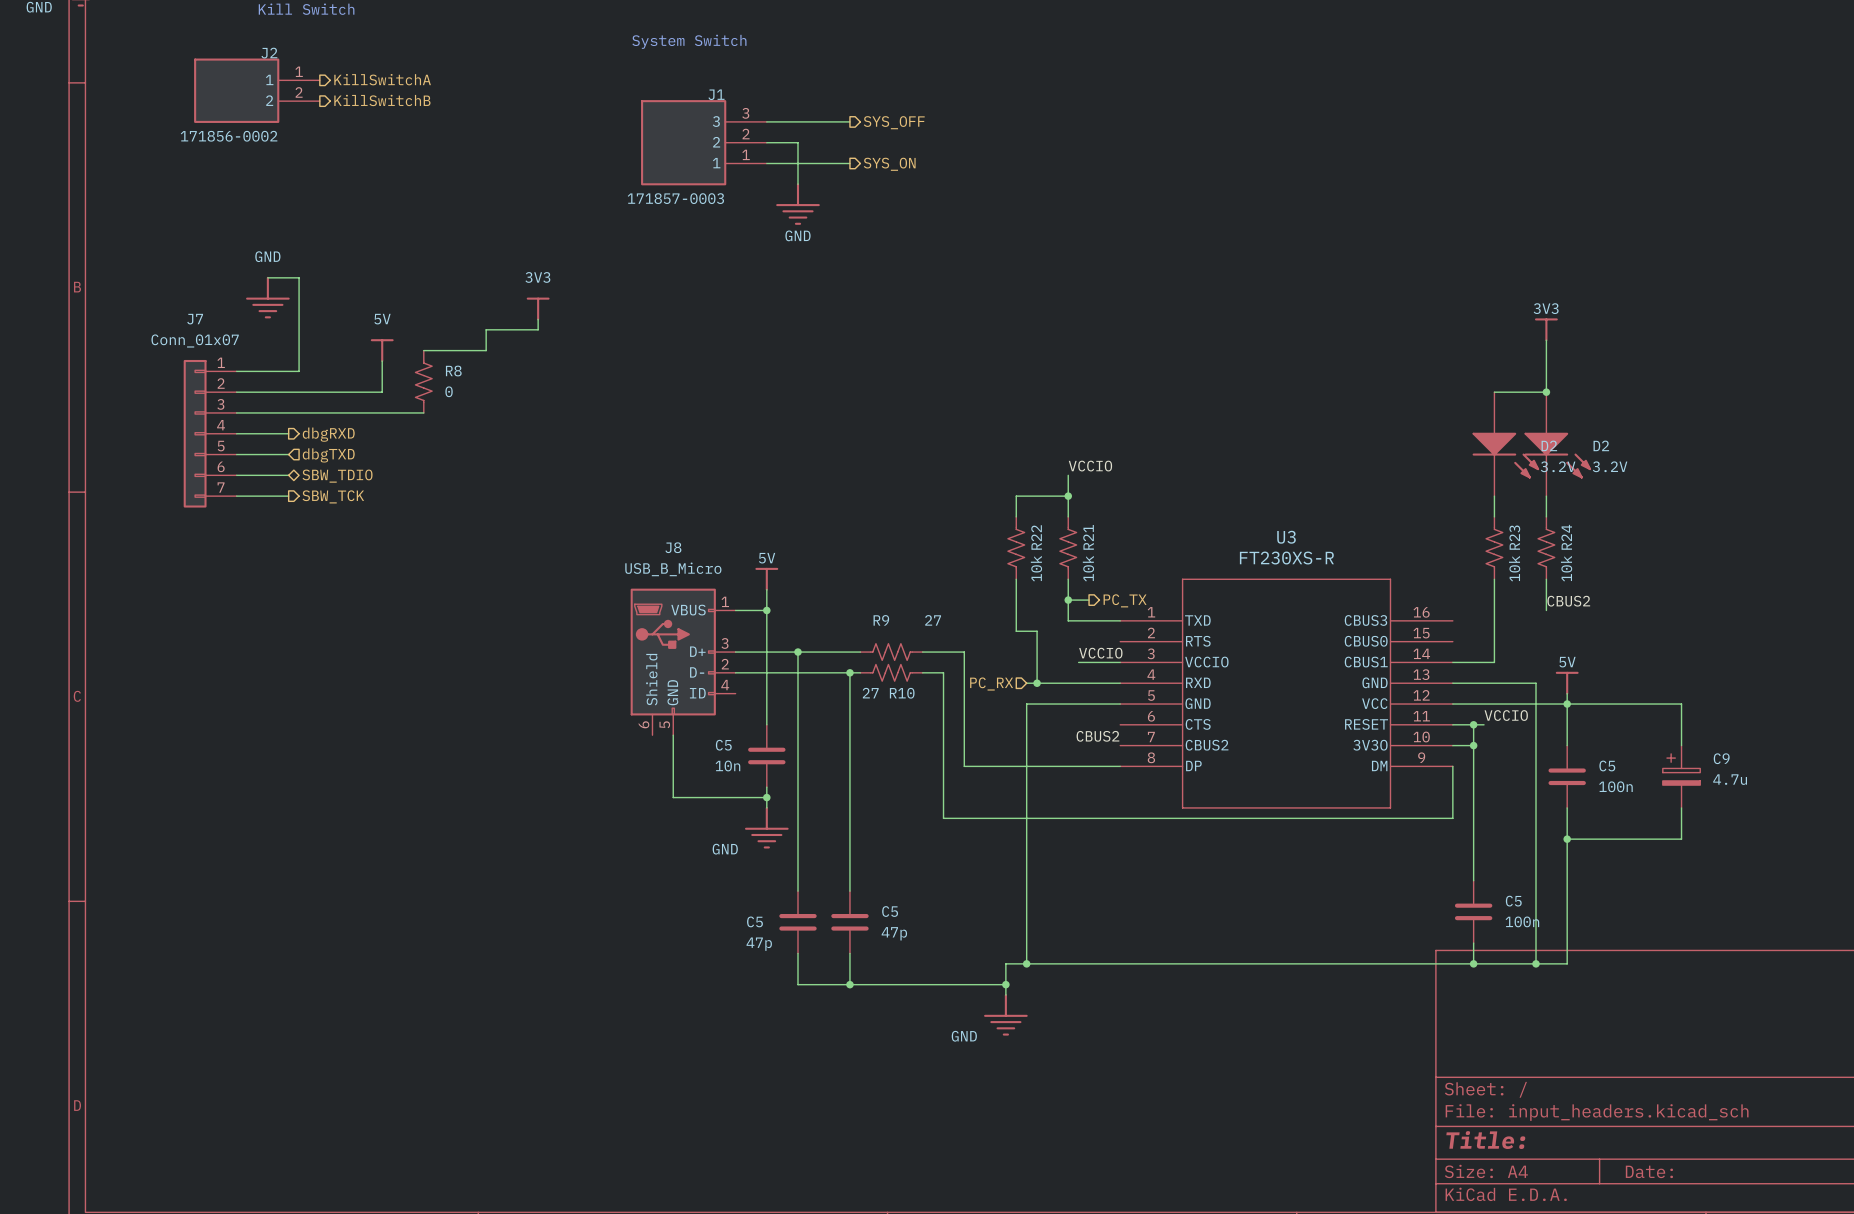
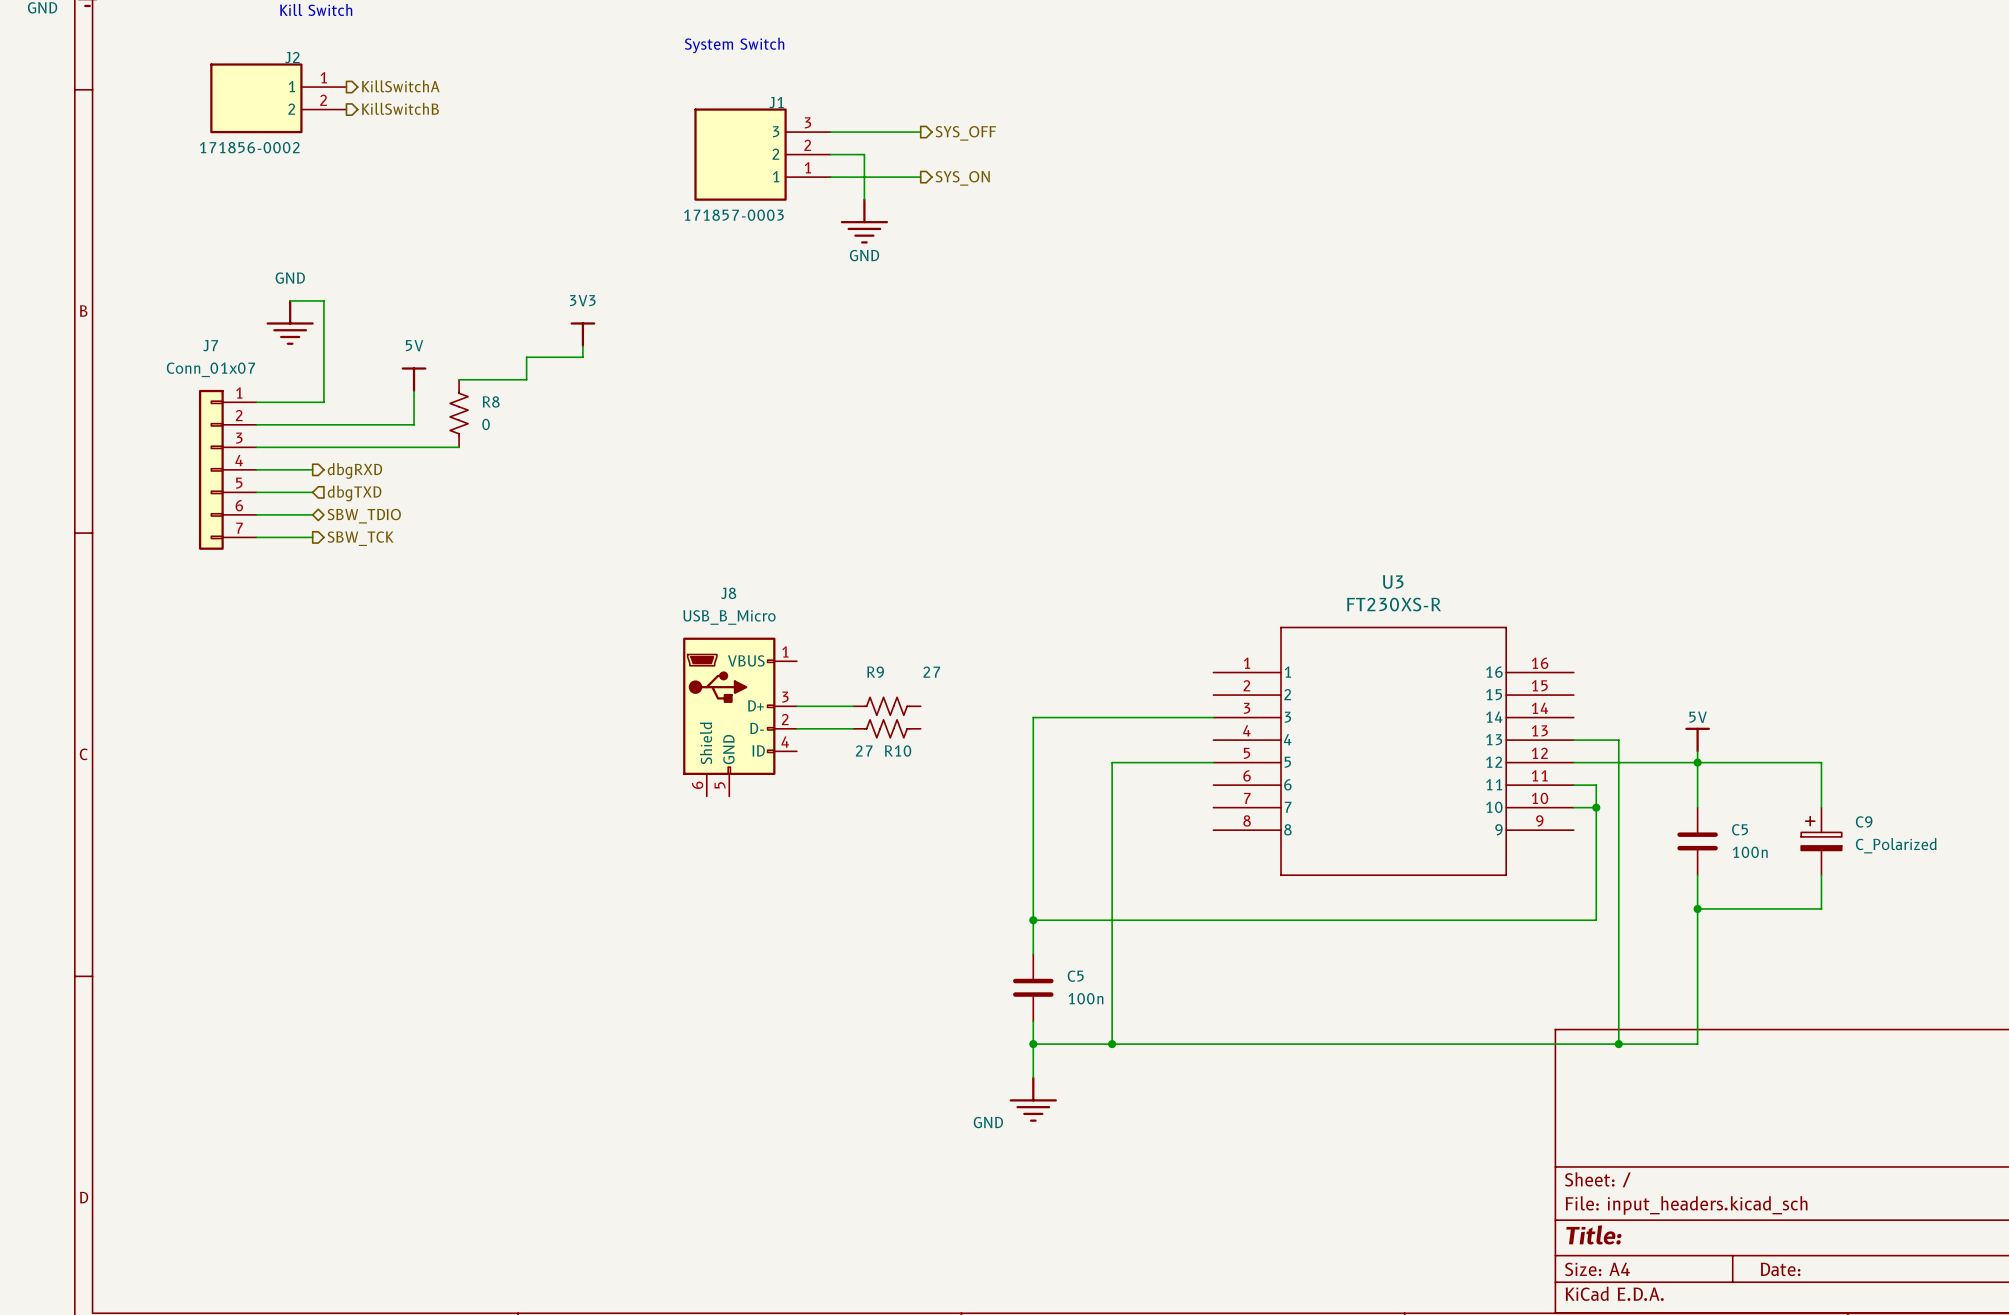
power symbol: 3V3 (1546, 329) -> none
wire: (1546, 340) (1546, 392) (1494, 392) -> none
junction: (1546, 392) -> none
D2: 3.2V (1505, 444) -> none
D2: 3.2V (1557, 444) -> none
label: VCCIO (1090, 466) -> none
wire: (1068, 475) (1068, 516) -> none
wire: (1068, 496) (1016, 496) (1016, 516) -> none
junction: (1068, 496) -> none
wire: (1494, 496) (1494, 516) -> none
wire: (1546, 496) (1546, 516) -> none
R22: 10k (1016, 548) -> none
R21: 10k (1068, 548) -> none
R23: 10k (1494, 548) -> none
R24: 10k (1546, 548) -> none
U3 symbol: [1120, 578, 1453, 809] -> [1213, 626, 1574, 876]
power symbol: 5V (766, 579) -> none
wire: (1016, 579) (1016, 631) (1037, 631) (1037, 683) -> none
wire: (1068, 579) (1068, 620) (1120, 620) -> none
wire: (1494, 579) (1494, 662) (1452, 662) -> none
wire: (1546, 579) (1546, 610) -> none
wire: (766, 589) (766, 724) -> none
wire: (1068, 600) (1089, 600) -> none
junction: (1068, 600) -> none
hierarchical label: PC_TX (1125, 600) -> none
label: CBUS2 (1568, 601) -> none
wire: (735, 610) (766, 610) -> none
junction: (766, 610) -> none
wire: (787, 652) (860, 652) -> none
wire: (797, 652) (797, 891) -> none
junction: (797, 652) -> none
R9 position: (891, 652) -> (886, 706)
wire: (922, 652) (964, 652) (964, 766) (1120, 766) -> none
label: VCCIO (1100, 653) -> none
wire: none -> (1168, 717) (1033, 717) (1033, 954)
wire: (787, 672) (860, 672) -> none
wire: (849, 672) (849, 891) -> none
junction: (849, 672) -> none
R10 position: (891, 672) -> (886, 728)
wire: (922, 672) (943, 672) (943, 818) (1452, 818) (1452, 766) -> none
wire: (1026, 683) (1120, 683) -> none
junction: (1037, 683) -> none
wire: (1494, 683) (1536, 683) (1536, 963) -> (1618, 740) (1618, 1044)
hierarchical label: PC_RX (991, 684) -> none
label: VCCIO (1506, 715) -> none
wire: (1473, 724) (1484, 724) -> none
junction: (1473, 724) -> none
wire: (673, 735) (673, 797) (766, 797) -> none
label: CBUS2 (1097, 736) -> none
C5: 10n (766, 755) -> none
C9 value: 4.7u (1730, 779) -> C_Polarized (1896, 845)
wire: (766, 787) (766, 807) -> none
junction: (766, 797) -> none
power symbol: GND (766, 827) -> none
junction: none -> (1033, 920)
wire: (1473, 849) (1473, 880) -> (1596, 920) (1033, 920)
C5: none -> 100n (1033, 987)
C5: 100n (1473, 911) -> none
C5: 47p (797, 922) -> none
C5: 47p (849, 922) -> none
wire: none -> (1033, 1021) (1033, 1077)
wire: (1473, 943) (1473, 963) -> none
wire: (797, 953) (797, 984) (1005, 984) -> none
wire: (849, 953) (849, 984) -> none
junction: none -> (1033, 1044)
wire: (1005, 963) (1005, 995) -> (1089, 1044) (1033, 1044)
junction: (1473, 963) -> none
junction: none -> (1618, 1044)
junction: (1536, 963) -> none
junction: (849, 984) -> none
junction: (1005, 984) -> none
power symbol position: GND (1005, 1014) -> GND (1033, 1099)

